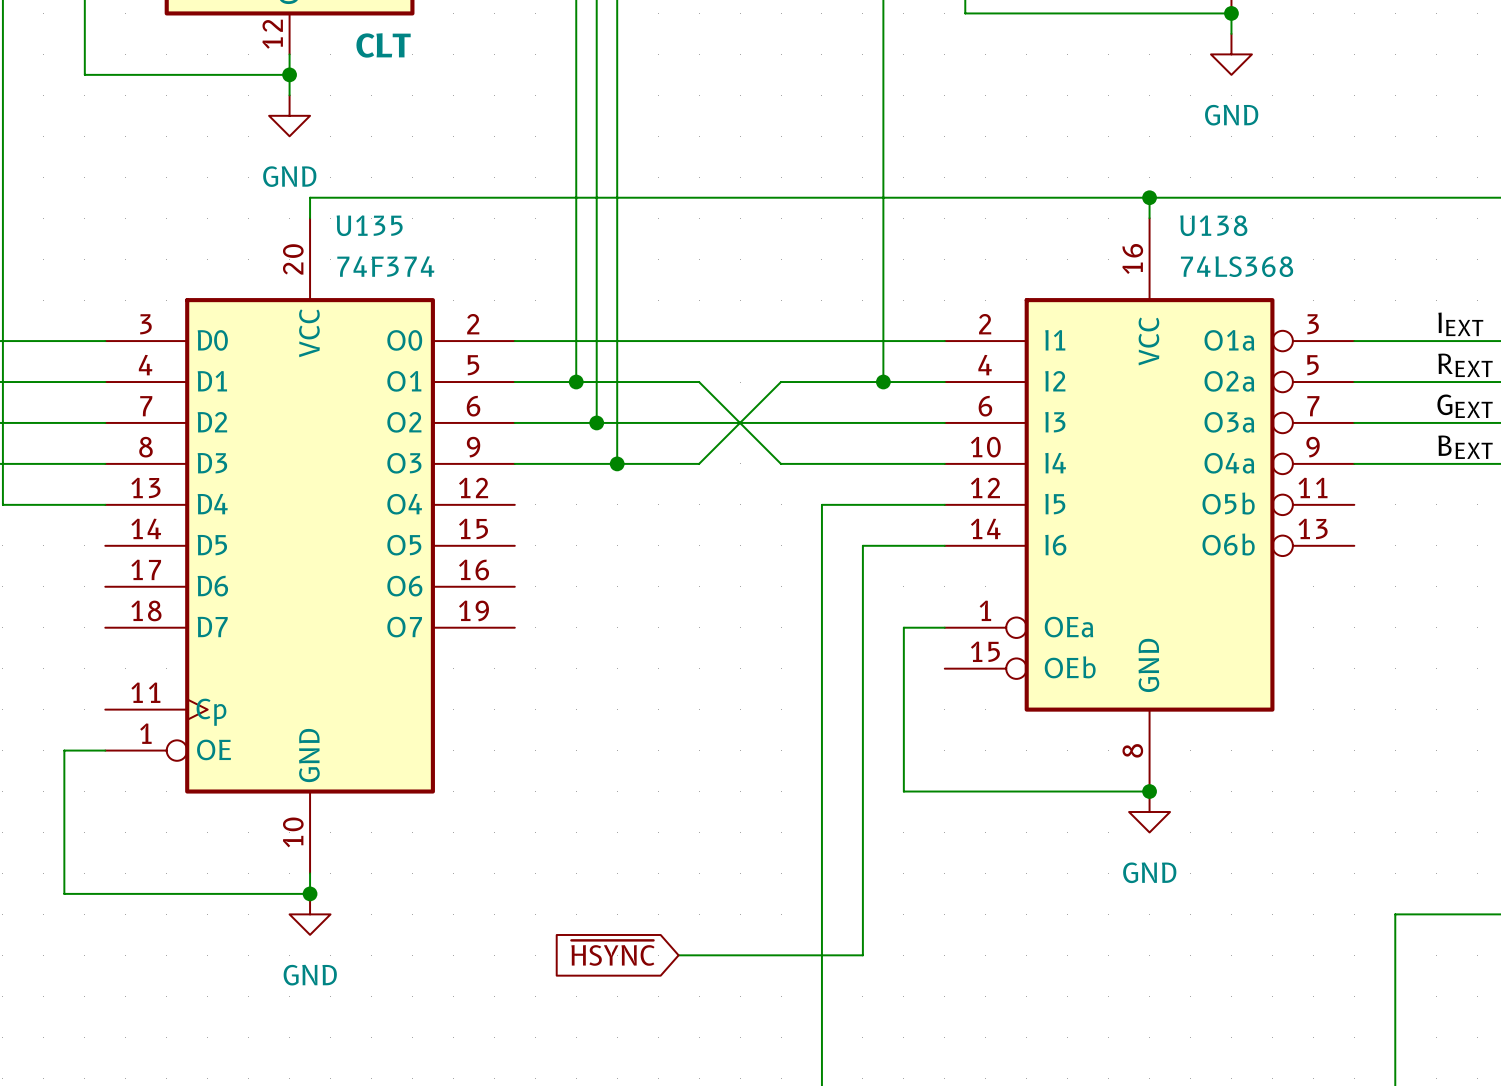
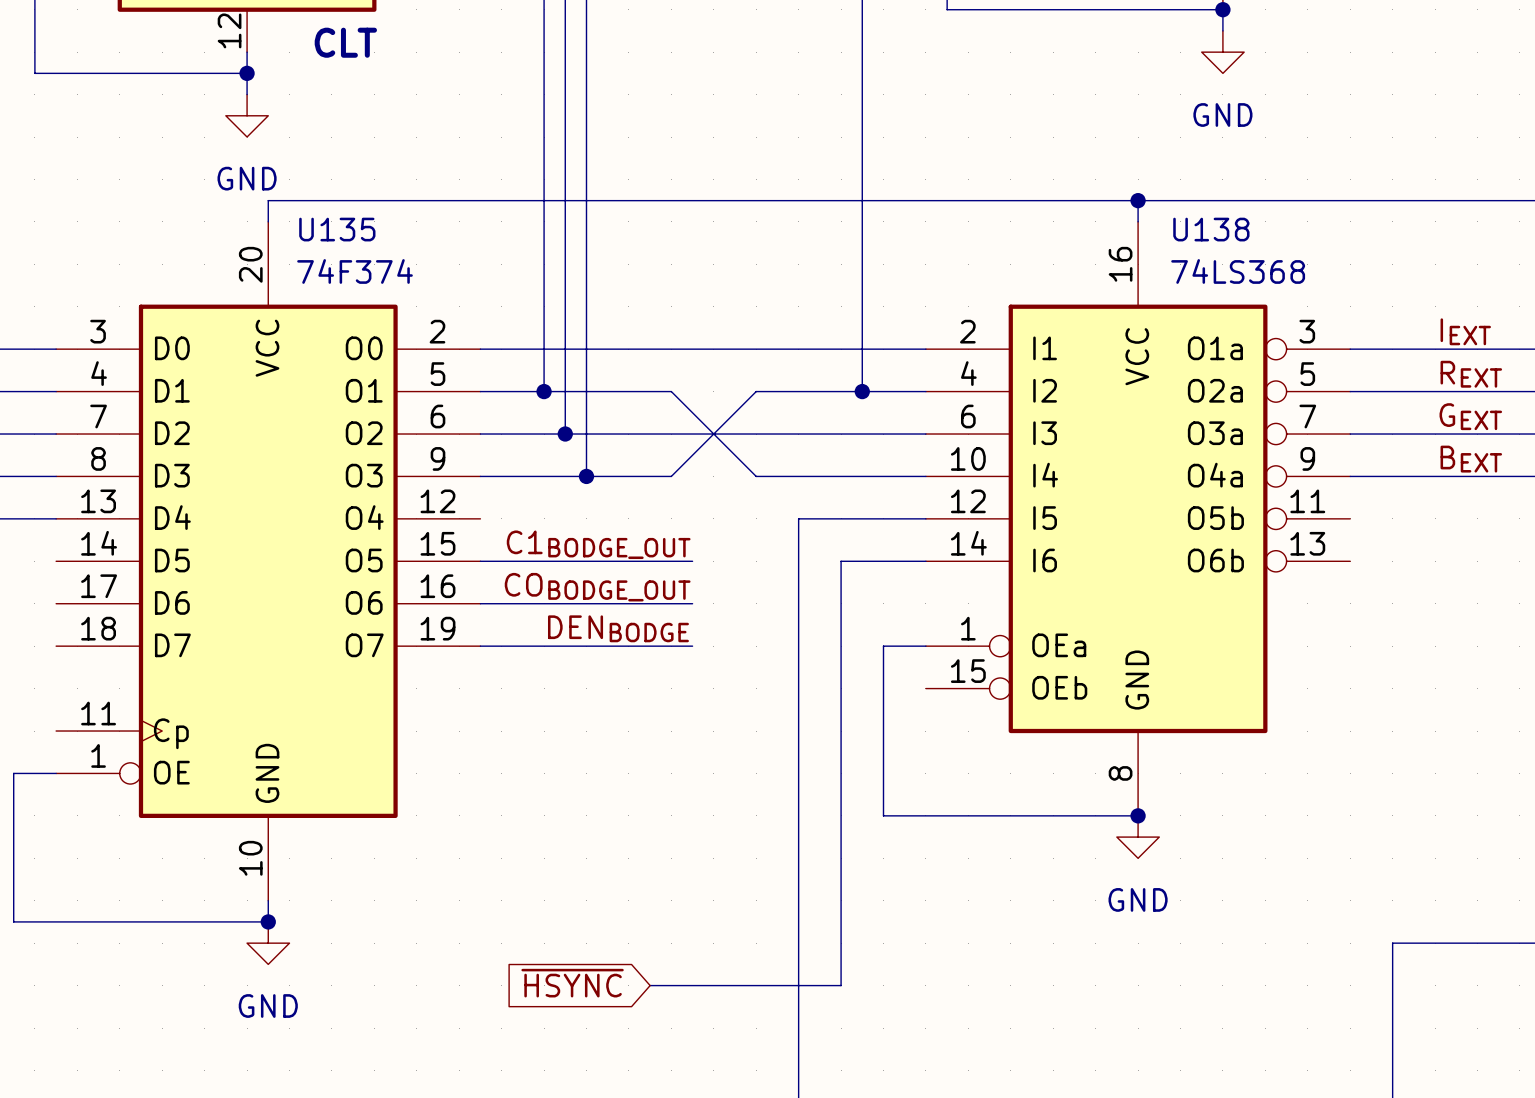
label: none -> C1BODGE_OUT (598, 544)
wire: none -> (480, 561) (692, 561)
label: none -> COBODGE_OUT (597, 587)
wire: none -> (480, 603) (692, 603)
label: none -> DENBODGE (618, 628)
wire: none -> (480, 646) (692, 646)

